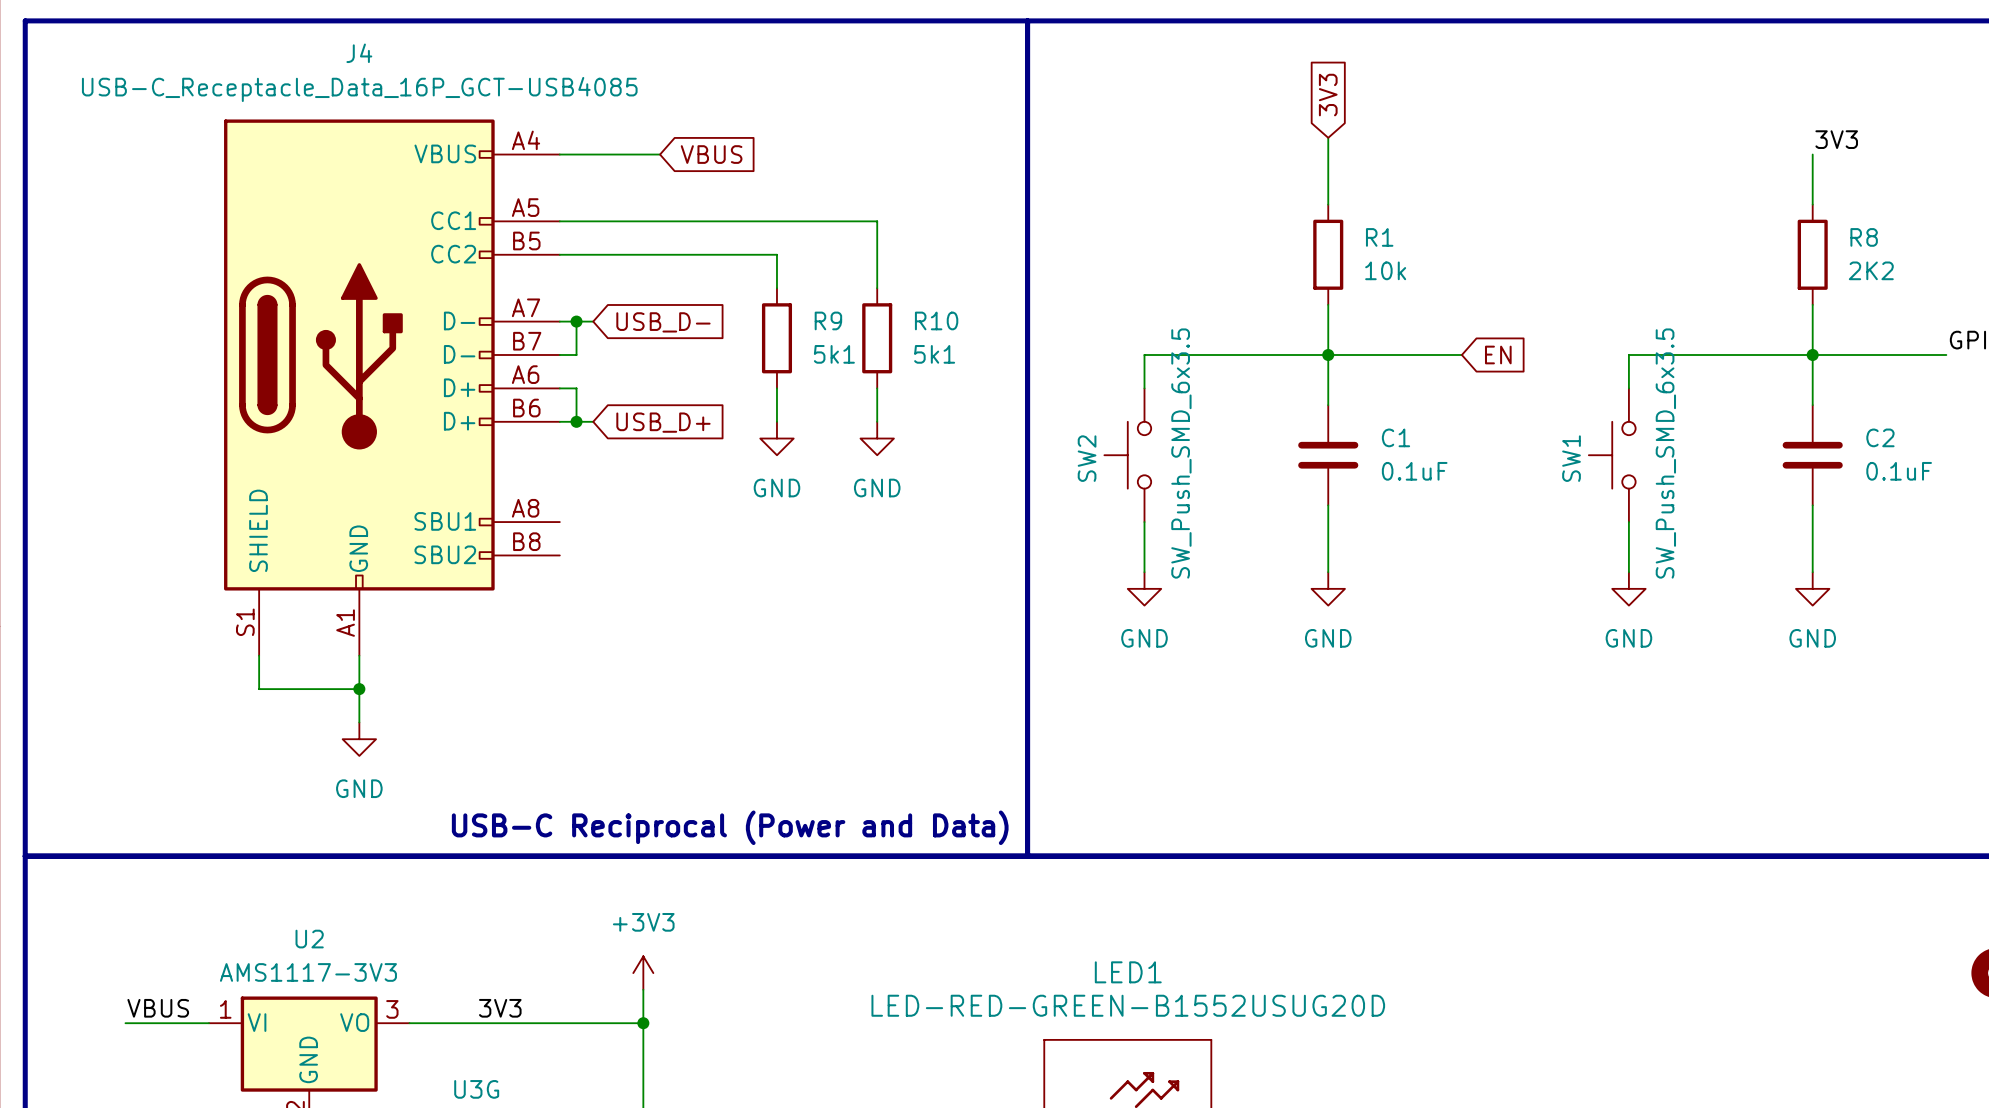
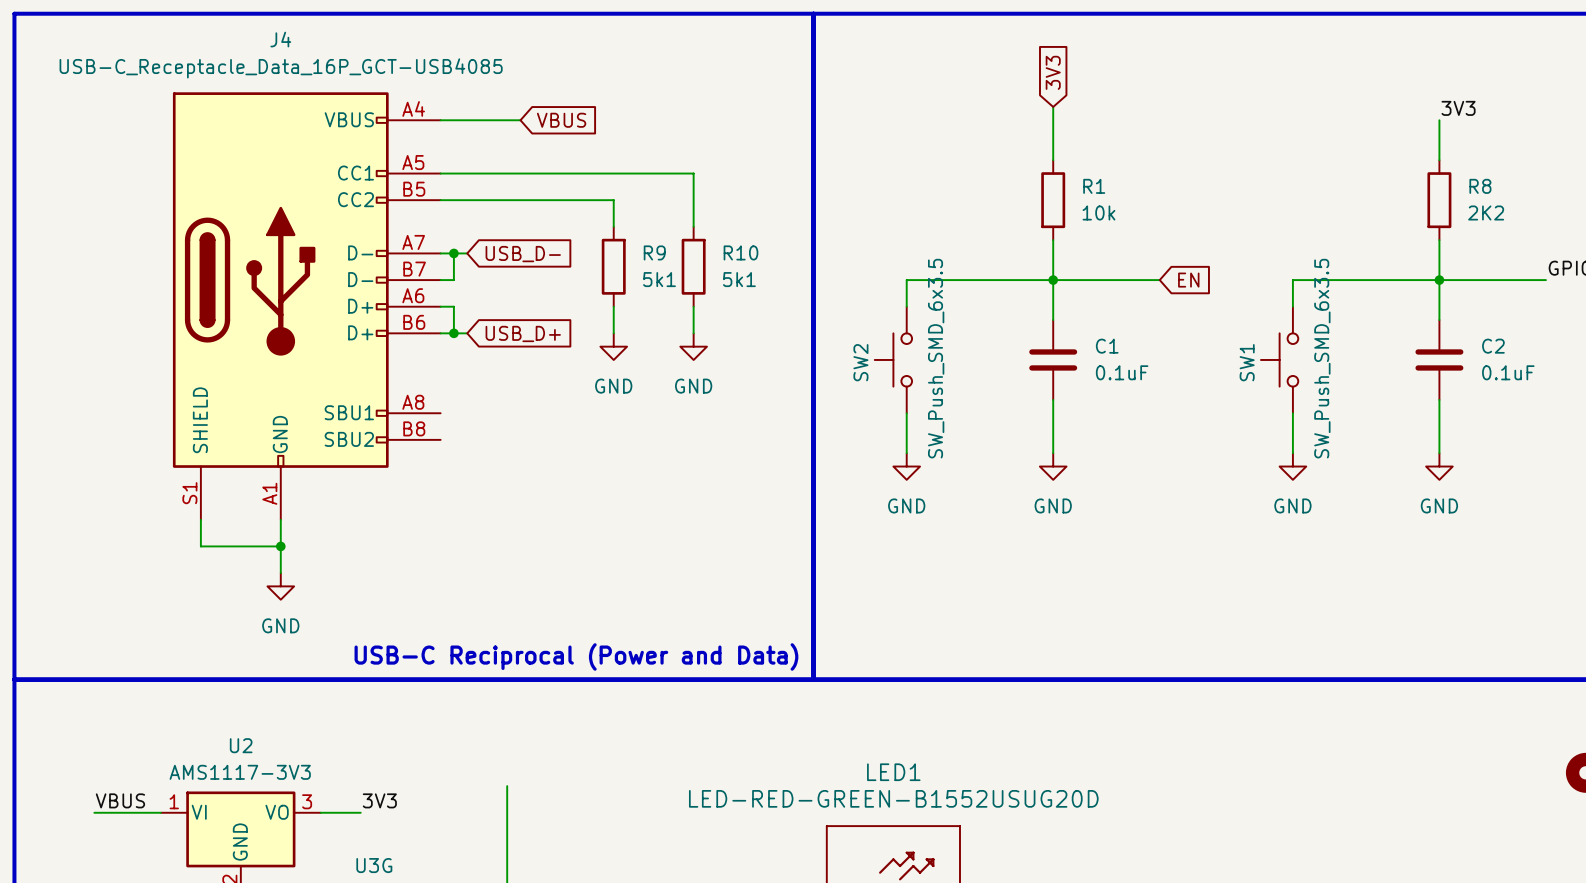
power symbol: +3V3 (643, 973) -> none
label position: 3V3 (500, 1008) -> 3V3 (379, 800)
wire: (459, 1023) (643, 1023) -> none
junction: (643, 1023) -> none

